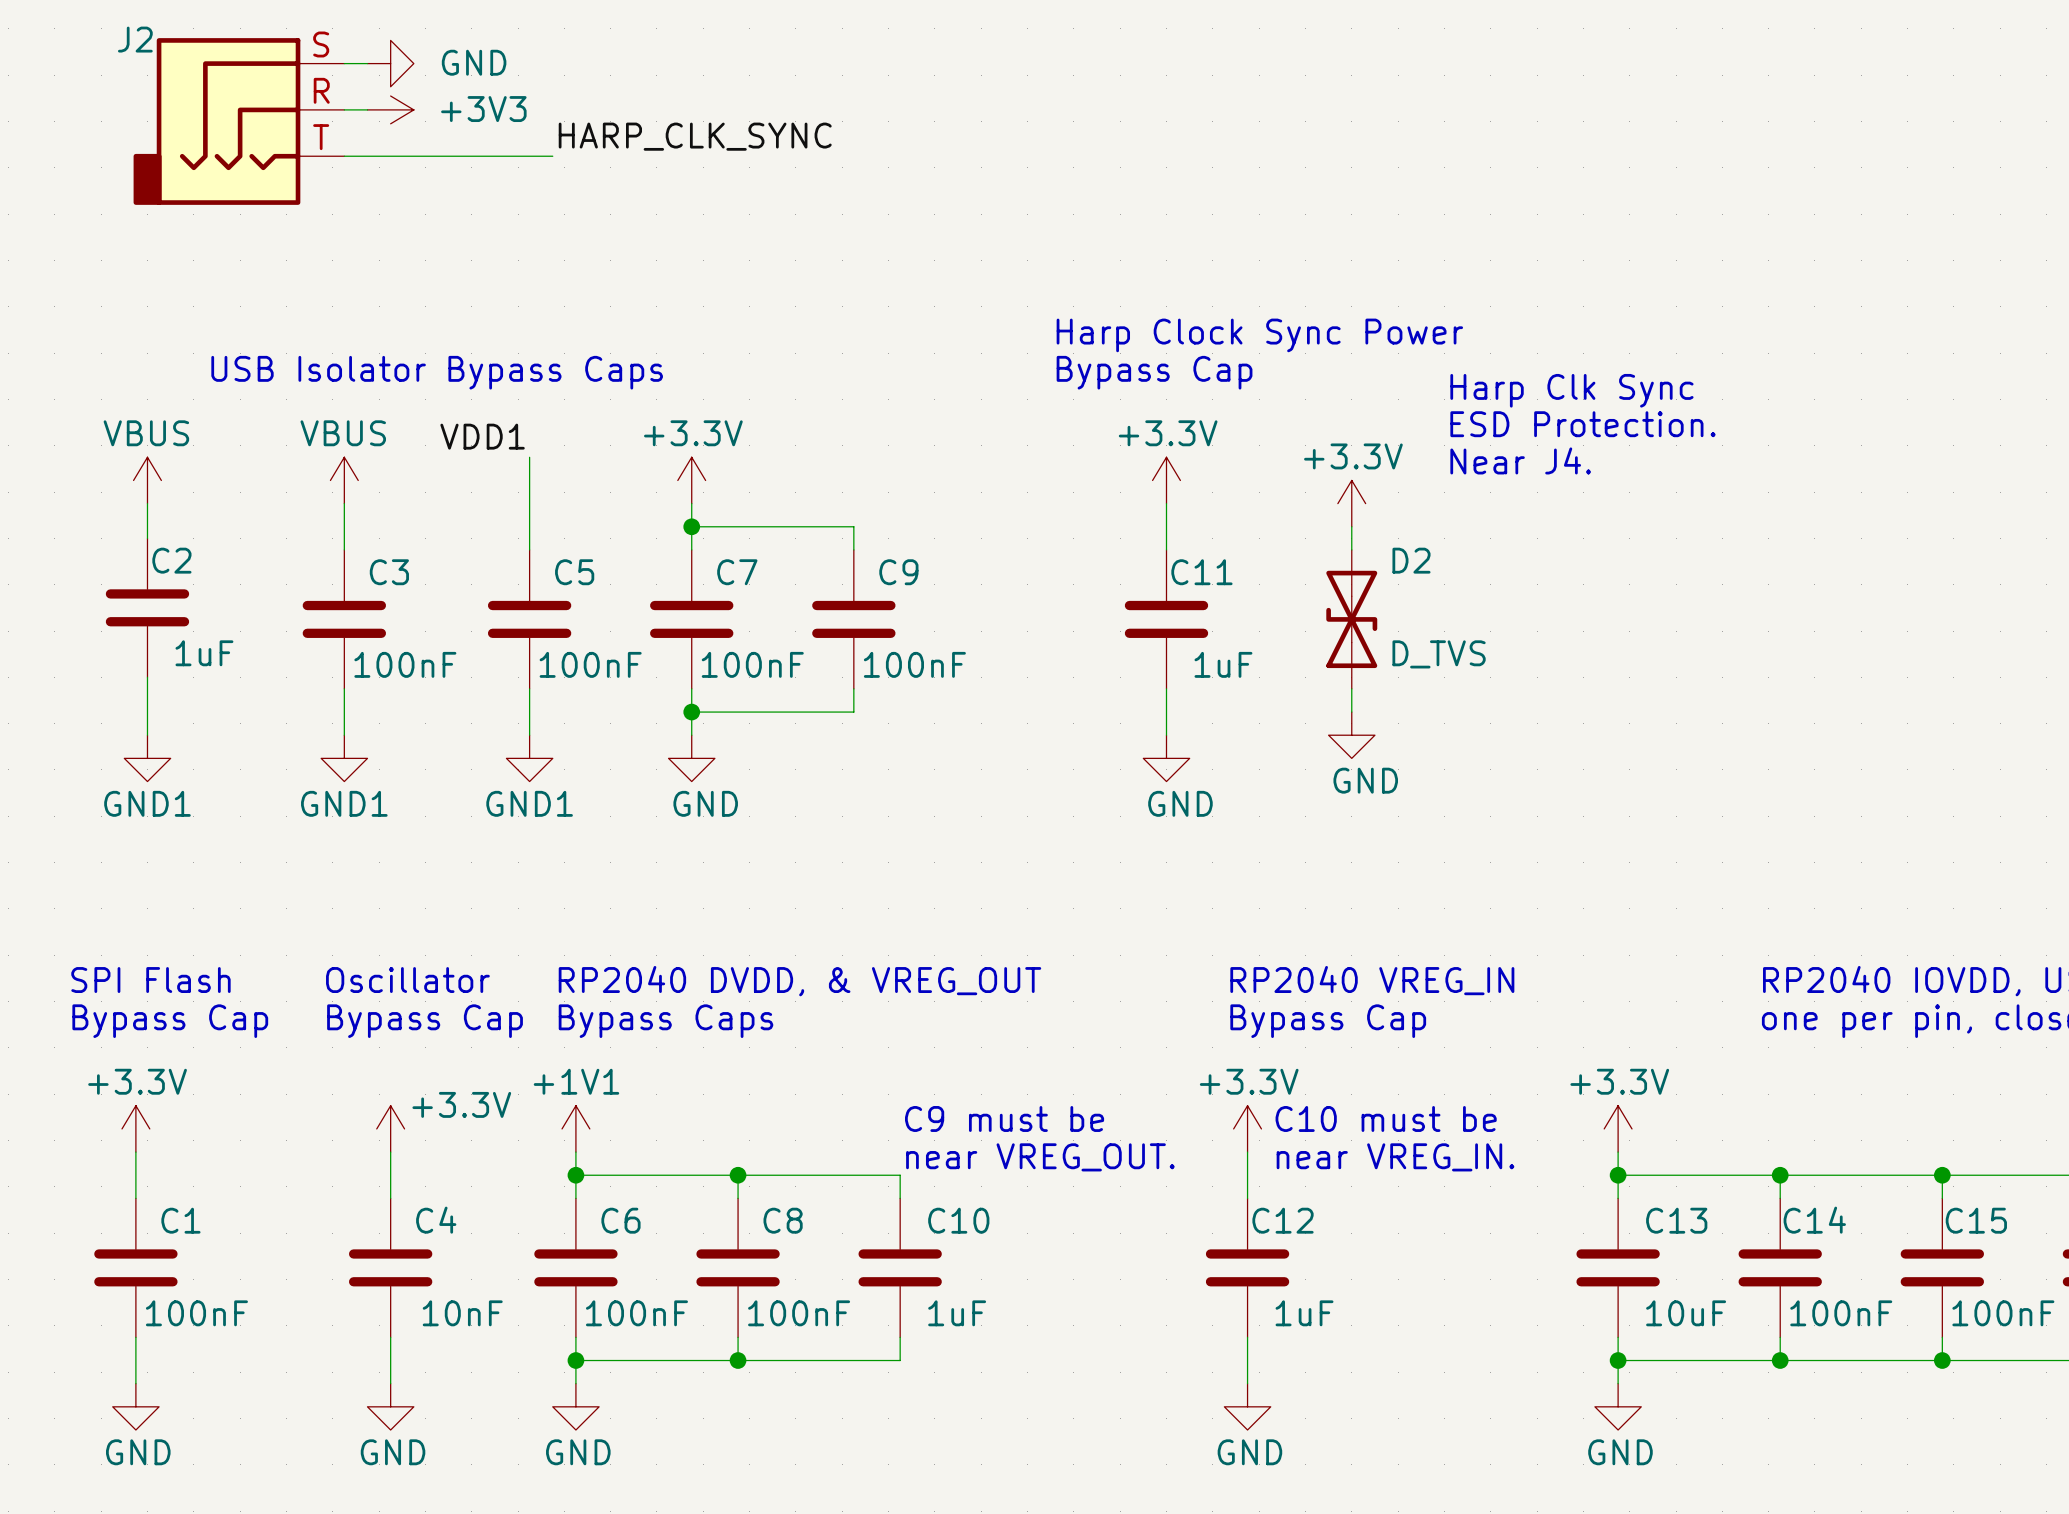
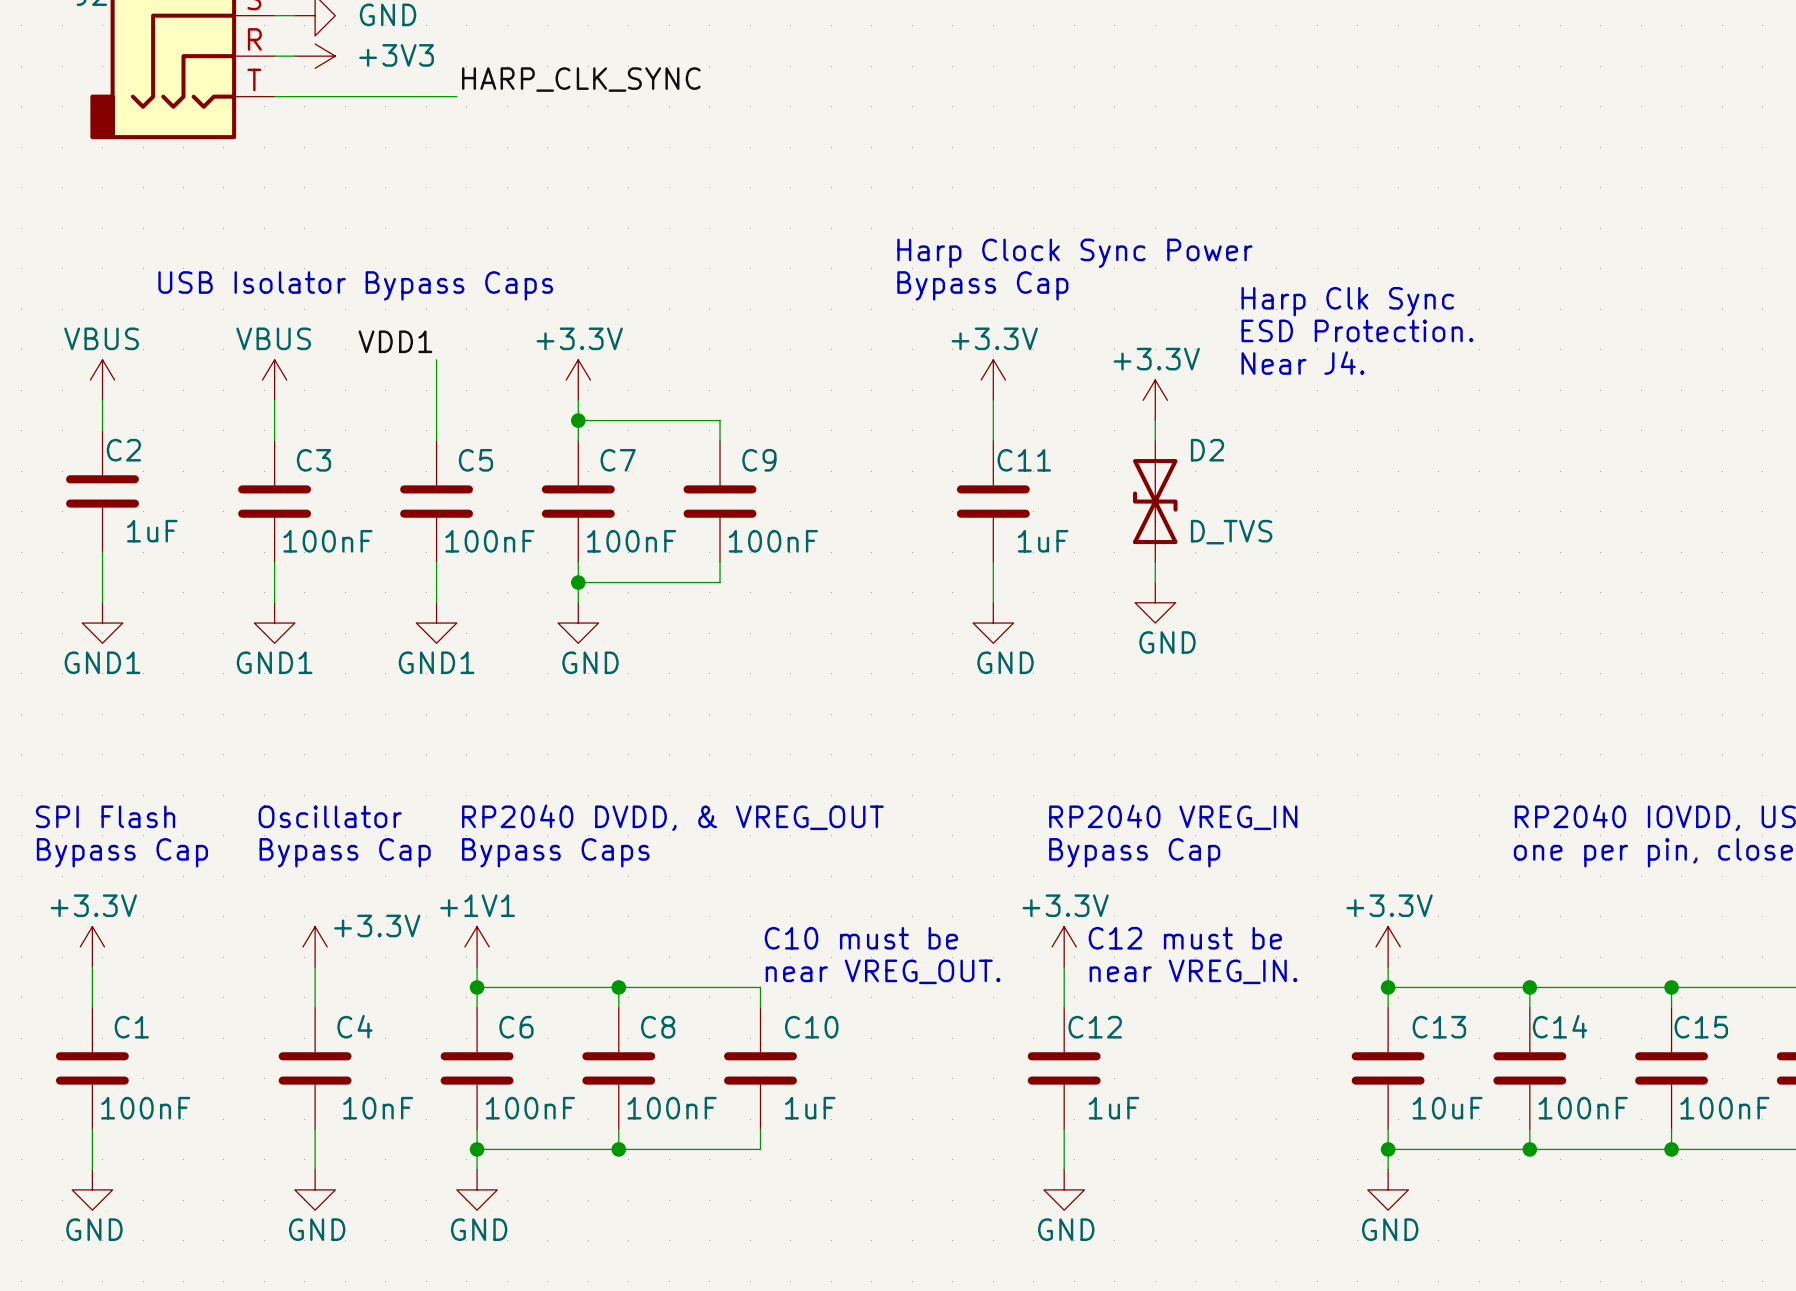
text: C9 must be (1004, 1118) -> C10 must be (861, 938)
text: C10 must be (1386, 1118) -> C12 must be (1185, 938)

